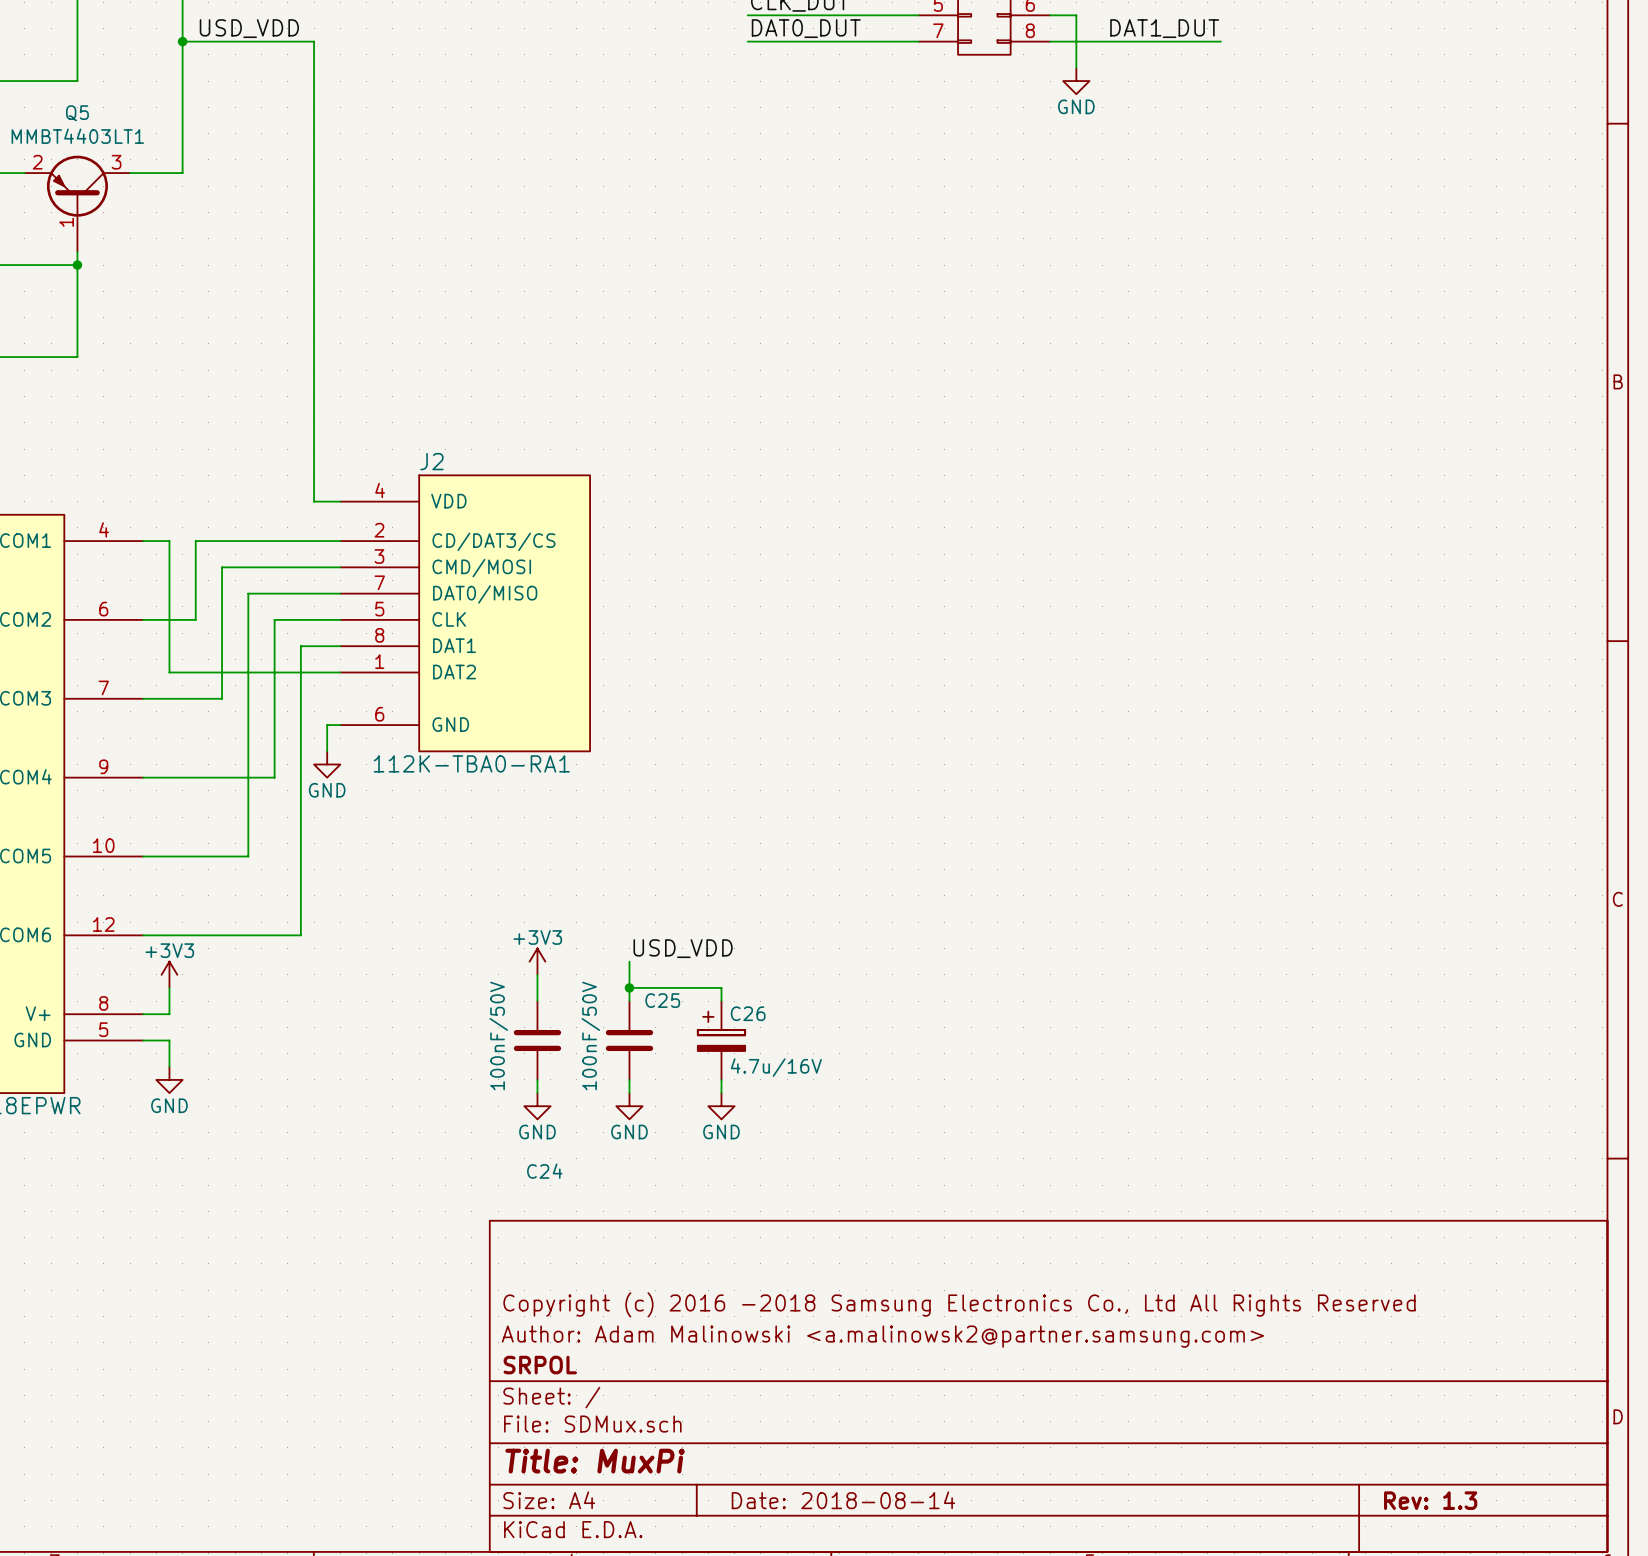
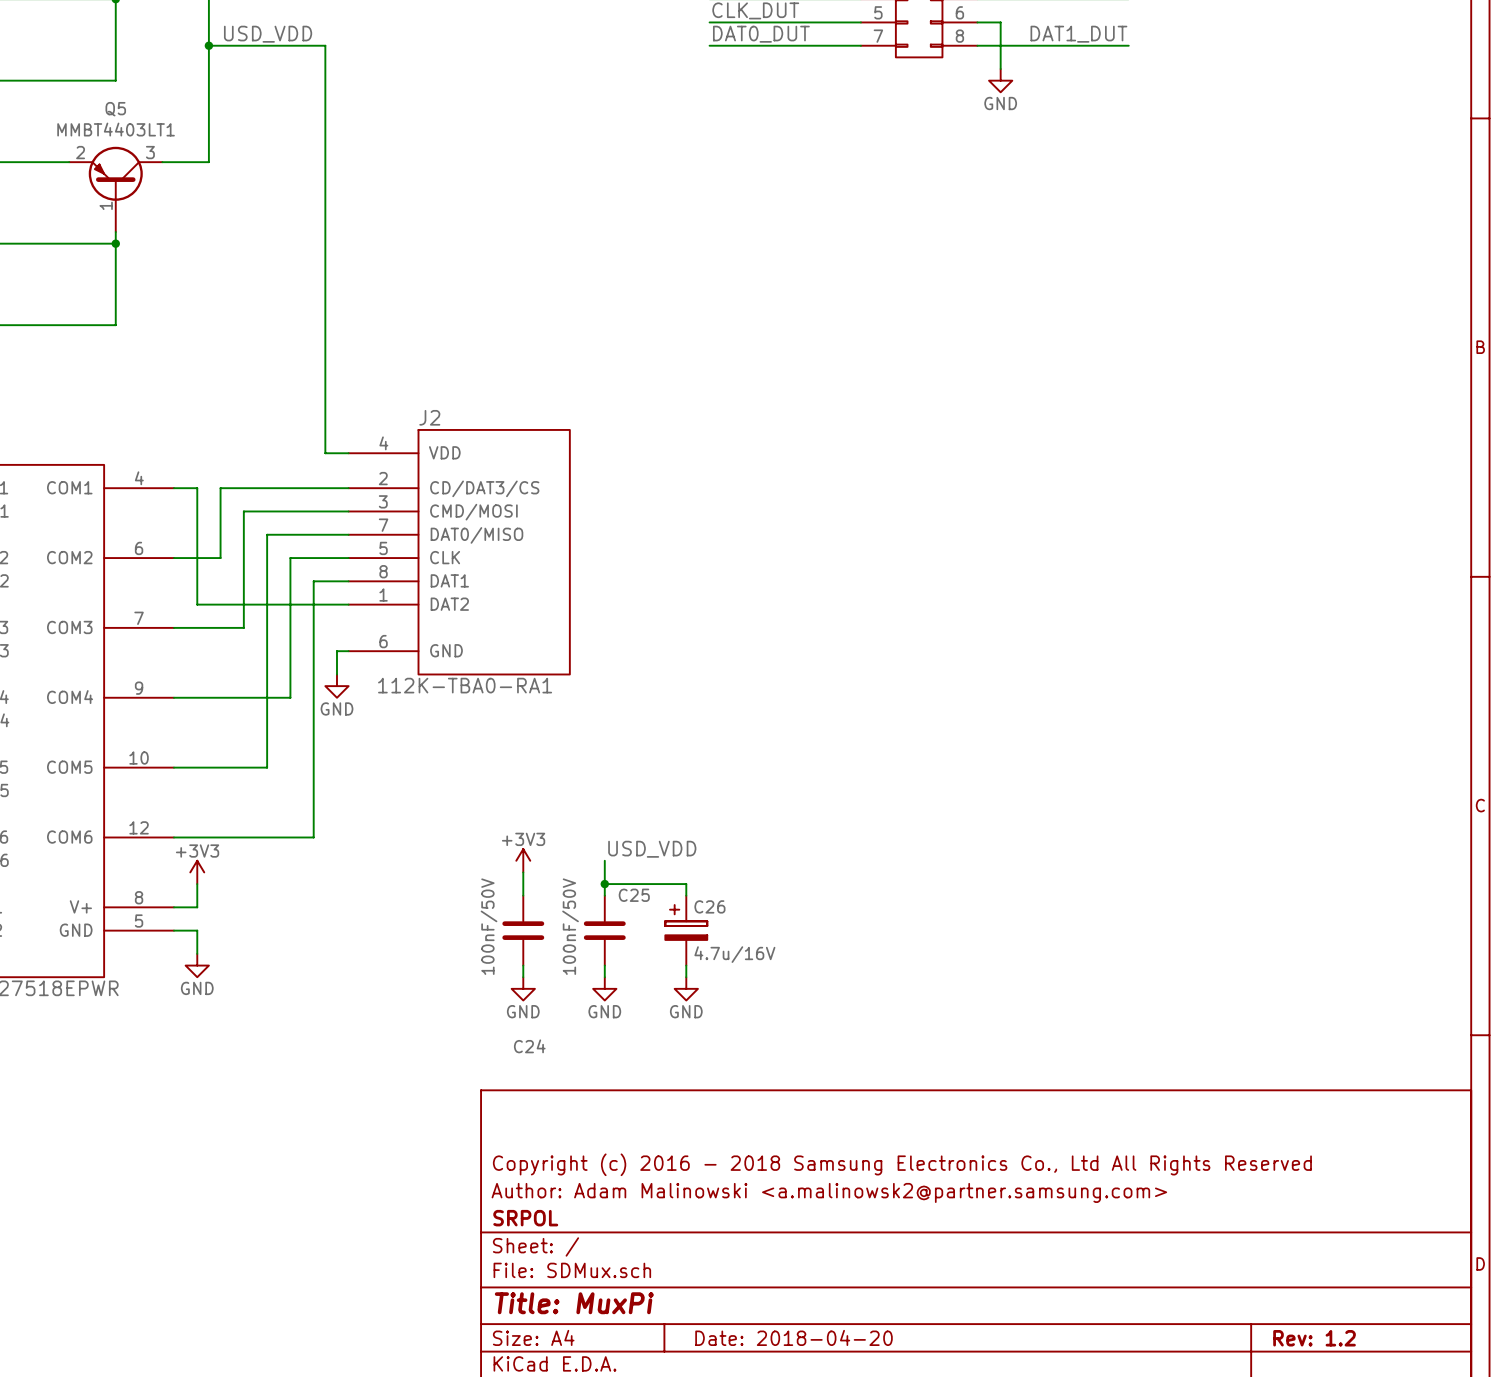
title block: Copyright (c) 2016 -2018 Samsung Electronics Co., Ltd All Rights Reserved (959, 1304) -> Copyright (c) 2016 - 2018 Samsung Electronics Co., Ltd All Rights Reserved (902, 1164)
title block: Date: 2018-08-14 (843, 1500) -> Date: 2018-04-20 (794, 1337)
title block: Rev: 1.3 (1430, 1500) -> Rev: 1.2 (1314, 1338)

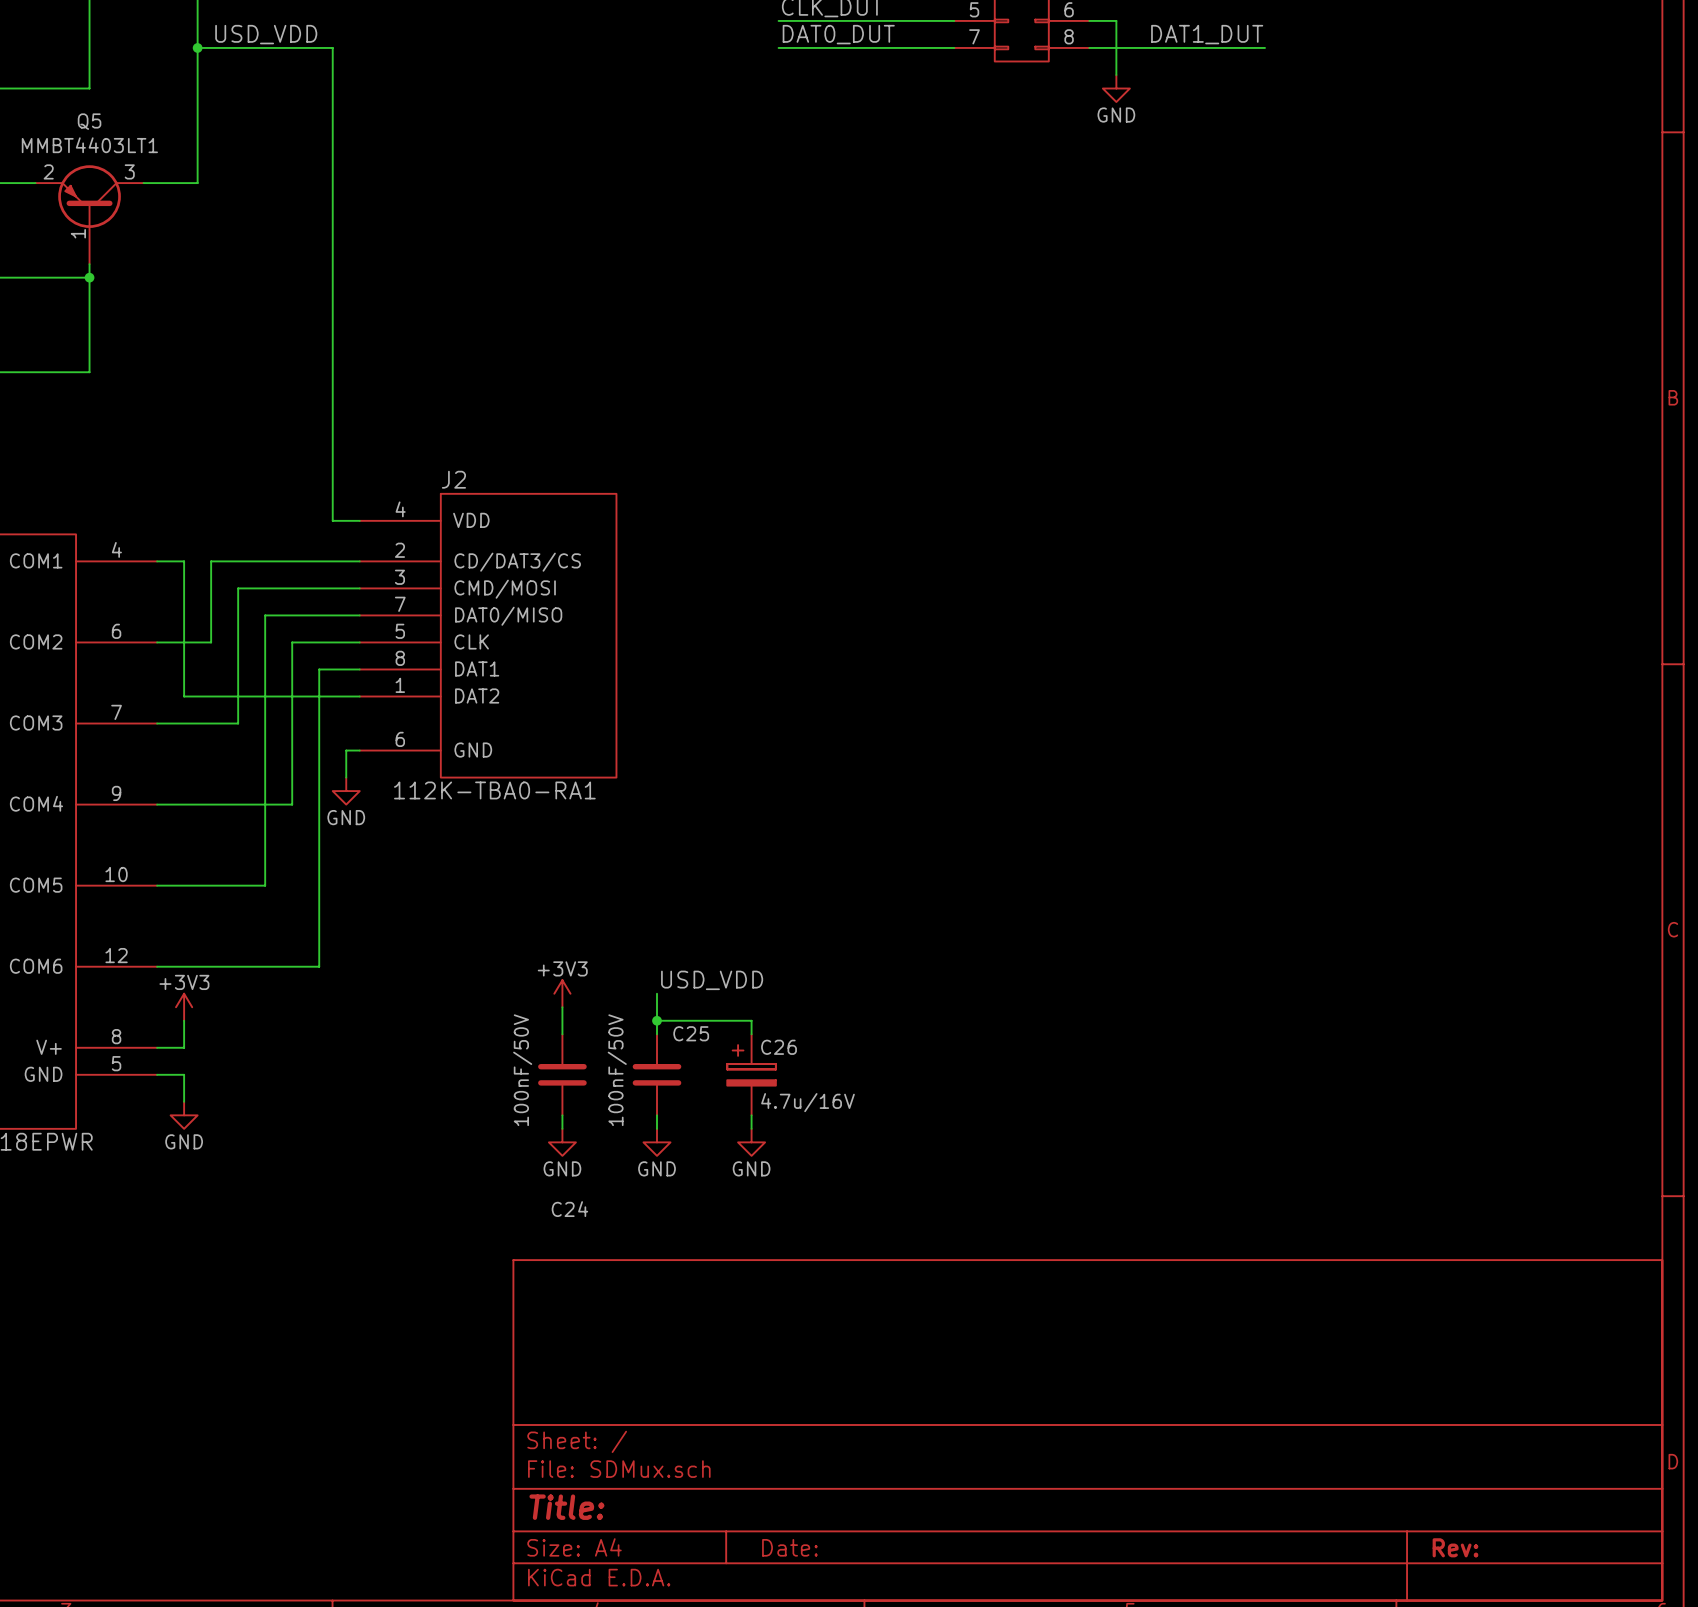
title block: Copyright (c) 2016 - 2018 Samsung Electronics Co., Ltd All Rights Reserved (902, 1164) -> none
title block: Author: Adam Malinowski <a.malinowsk2@partner.samsung.com> (829, 1192) -> none
title block: SRPOL (525, 1218) -> none
title block: Title: MuxPi (574, 1303) -> Title: (566, 1507)
title block: Date: 2018-04-20 (794, 1337) -> Date: (789, 1547)
title block: Rev: 1.2 (1314, 1338) -> Rev: (1455, 1547)

